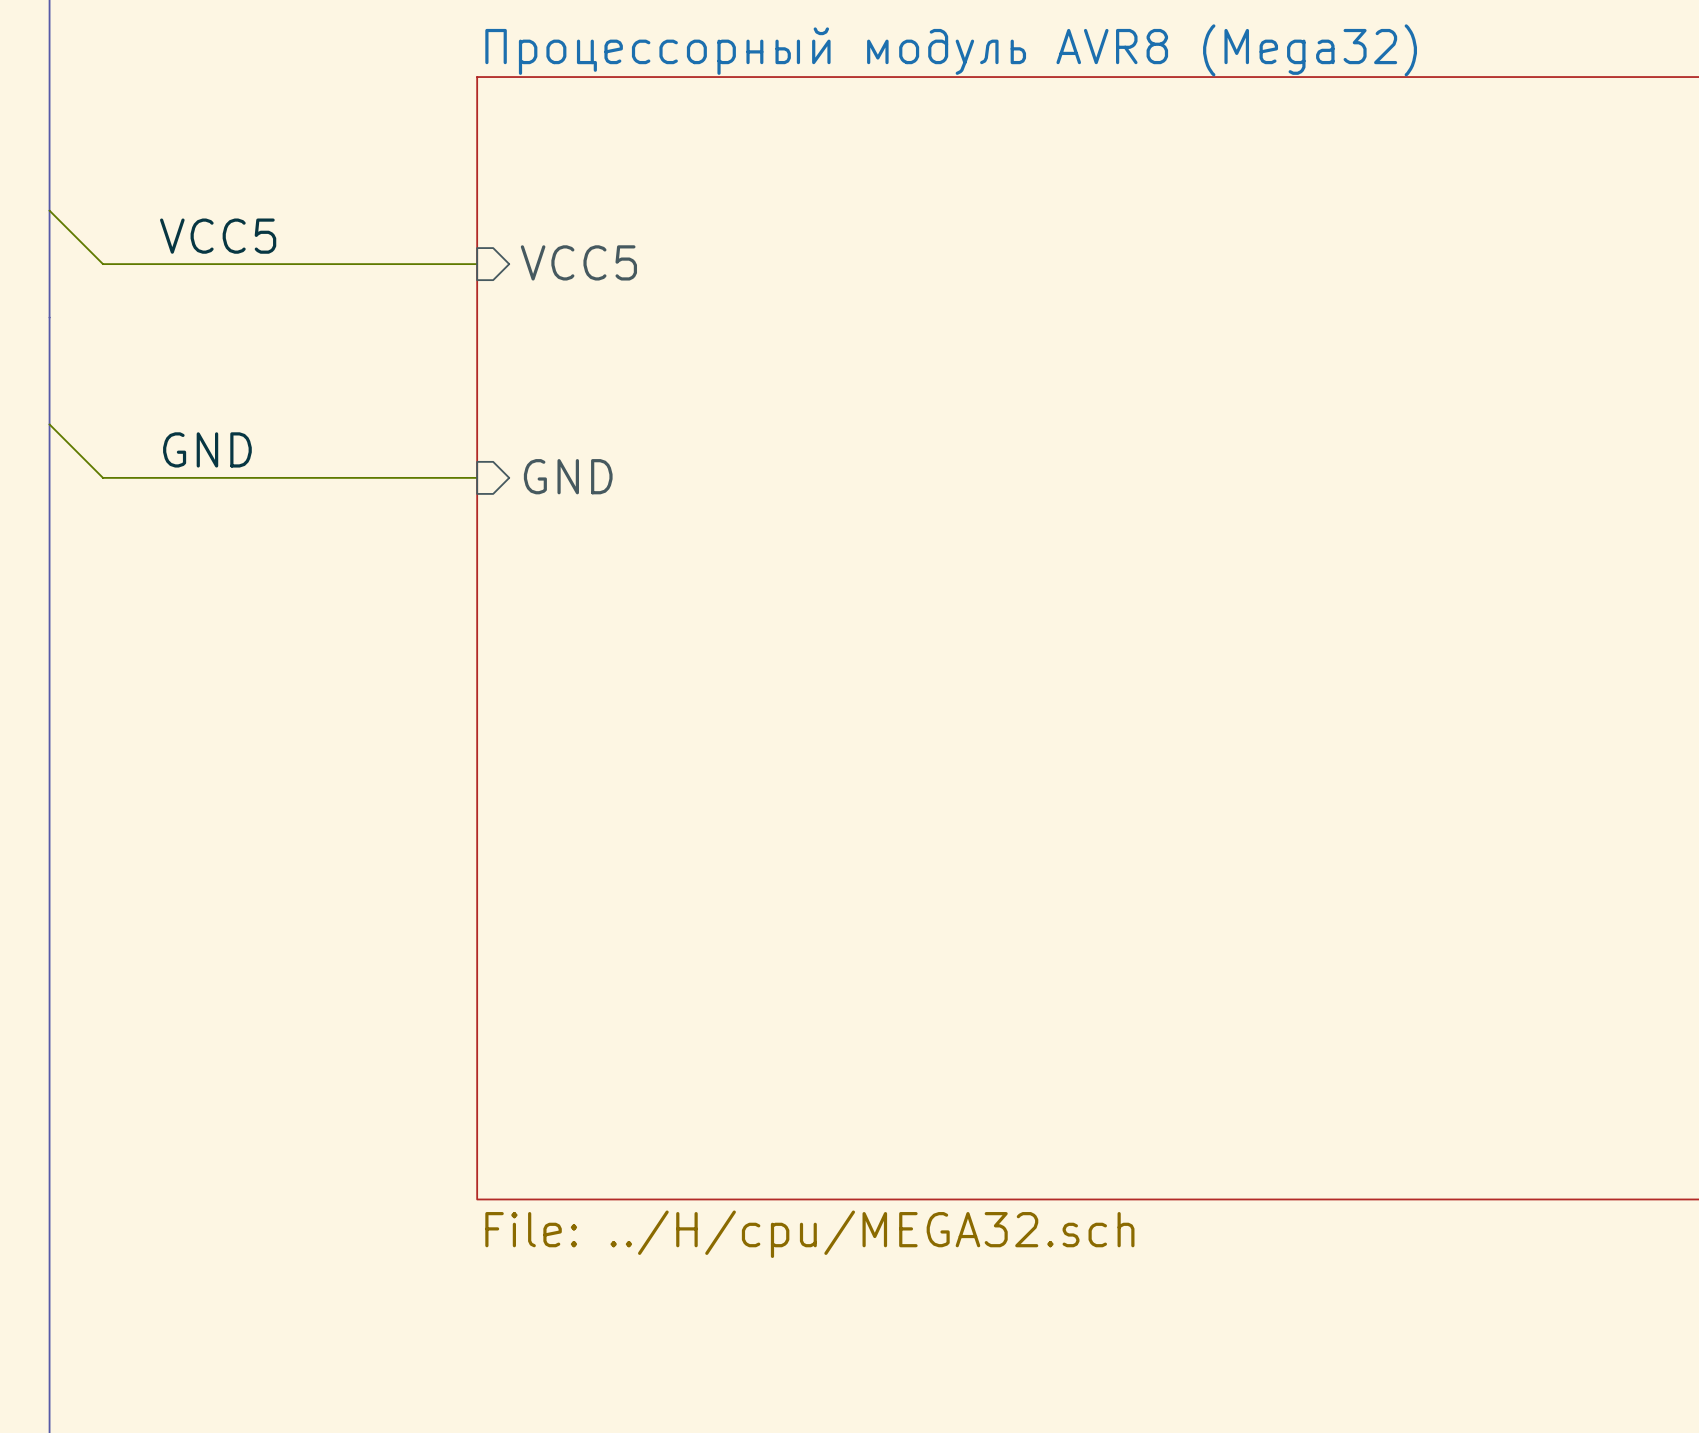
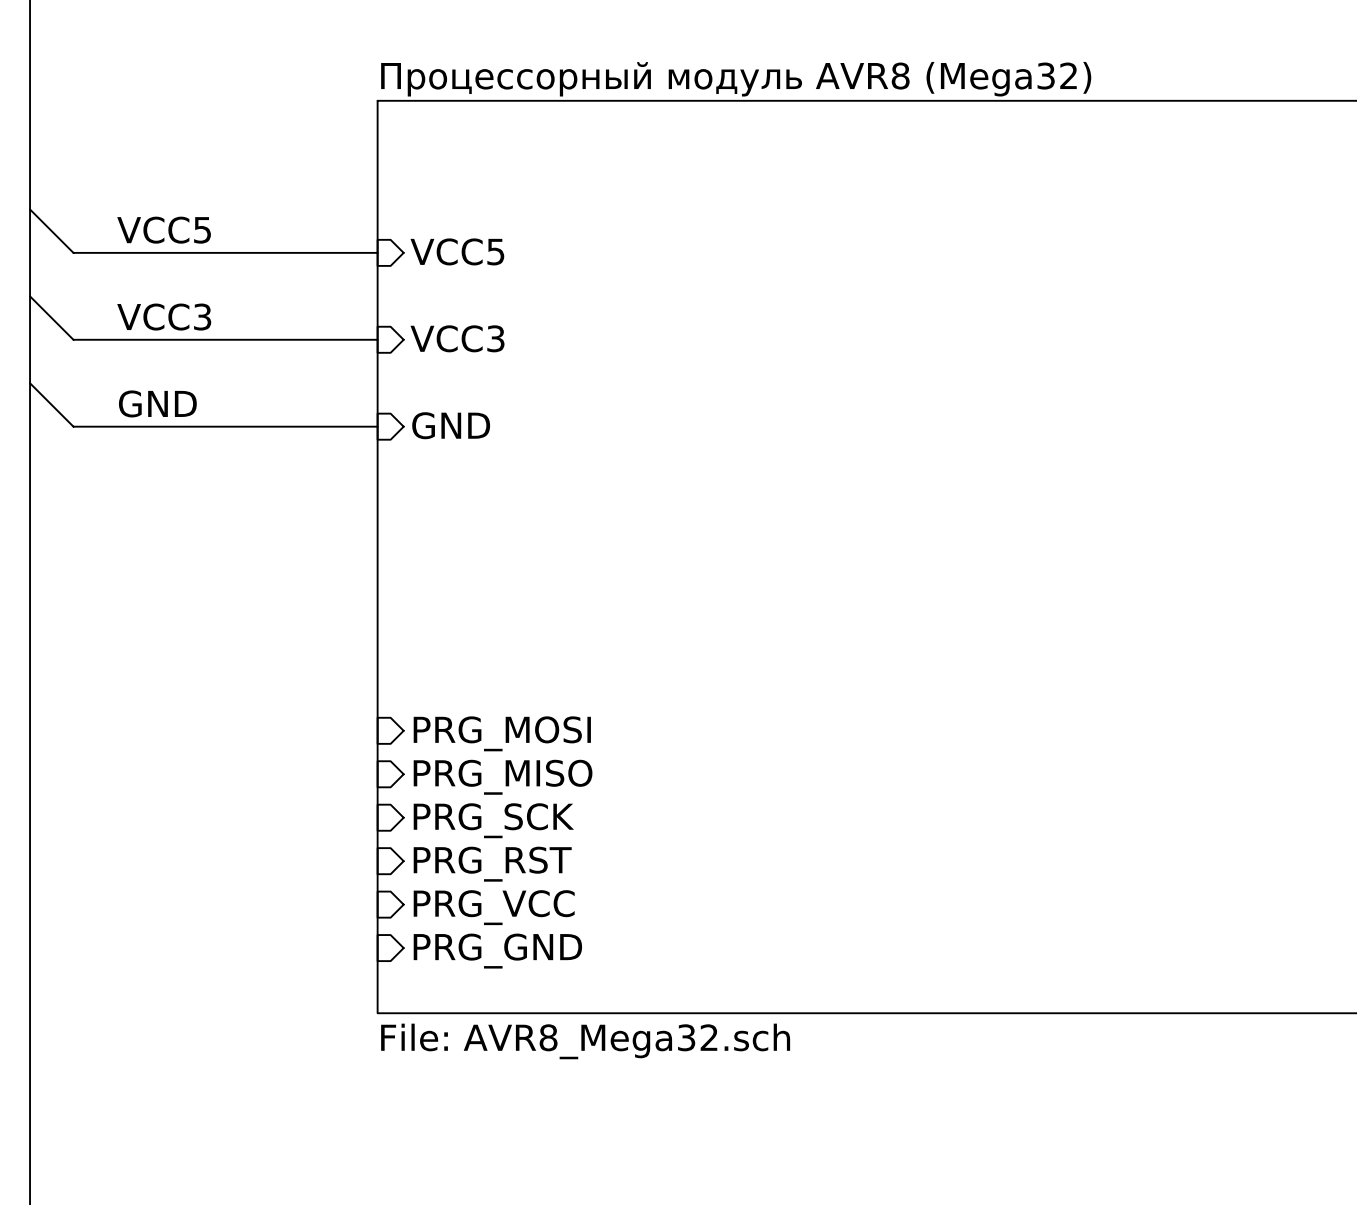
wire: none -> (30, 296) (73, 339) (377, 339)
label: none -> VCC3 (164, 317)
sheet pin: none -> VCC3 (457, 338)
sheet pin: none -> PRG_MOSI (502, 733)
sheet pin: none -> PRG_MISO (503, 777)
sheet pin: none -> PRG_SCK (493, 820)
sheet pin: none -> PRG_RST (492, 864)
sheet pin: none -> PRG_VCC (494, 907)
sheet pin: none -> PRG_GND (497, 951)
sheet Процессорный модуль AVR8 (Mega32) value: File: ../H/cpu/MEGA32.sch (809, 1234) -> File: AVR8_Mega32.sch (585, 1041)

